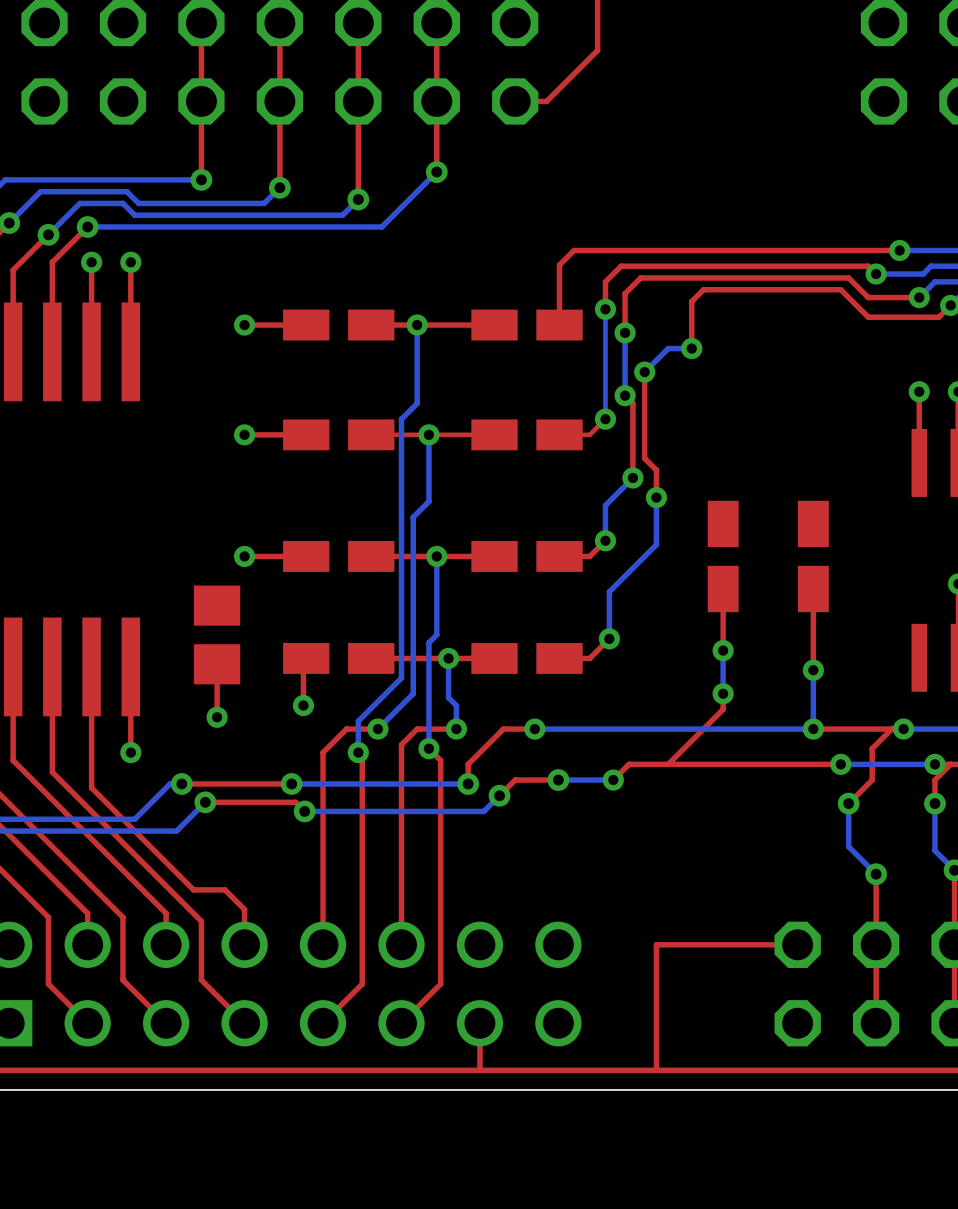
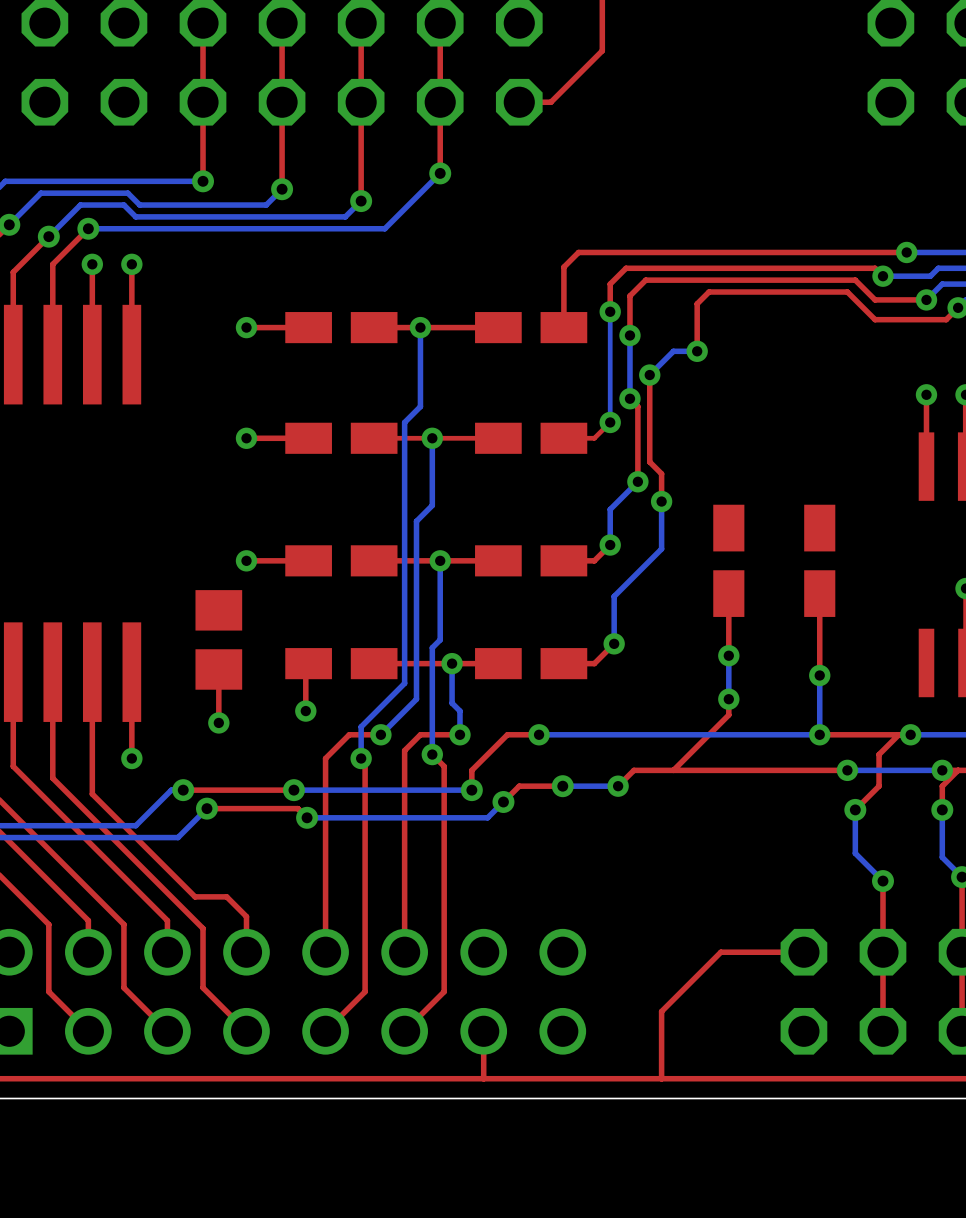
top track: (715, 944) (656, 944) (656, 1003) -> (720, 952) (661, 1011)

